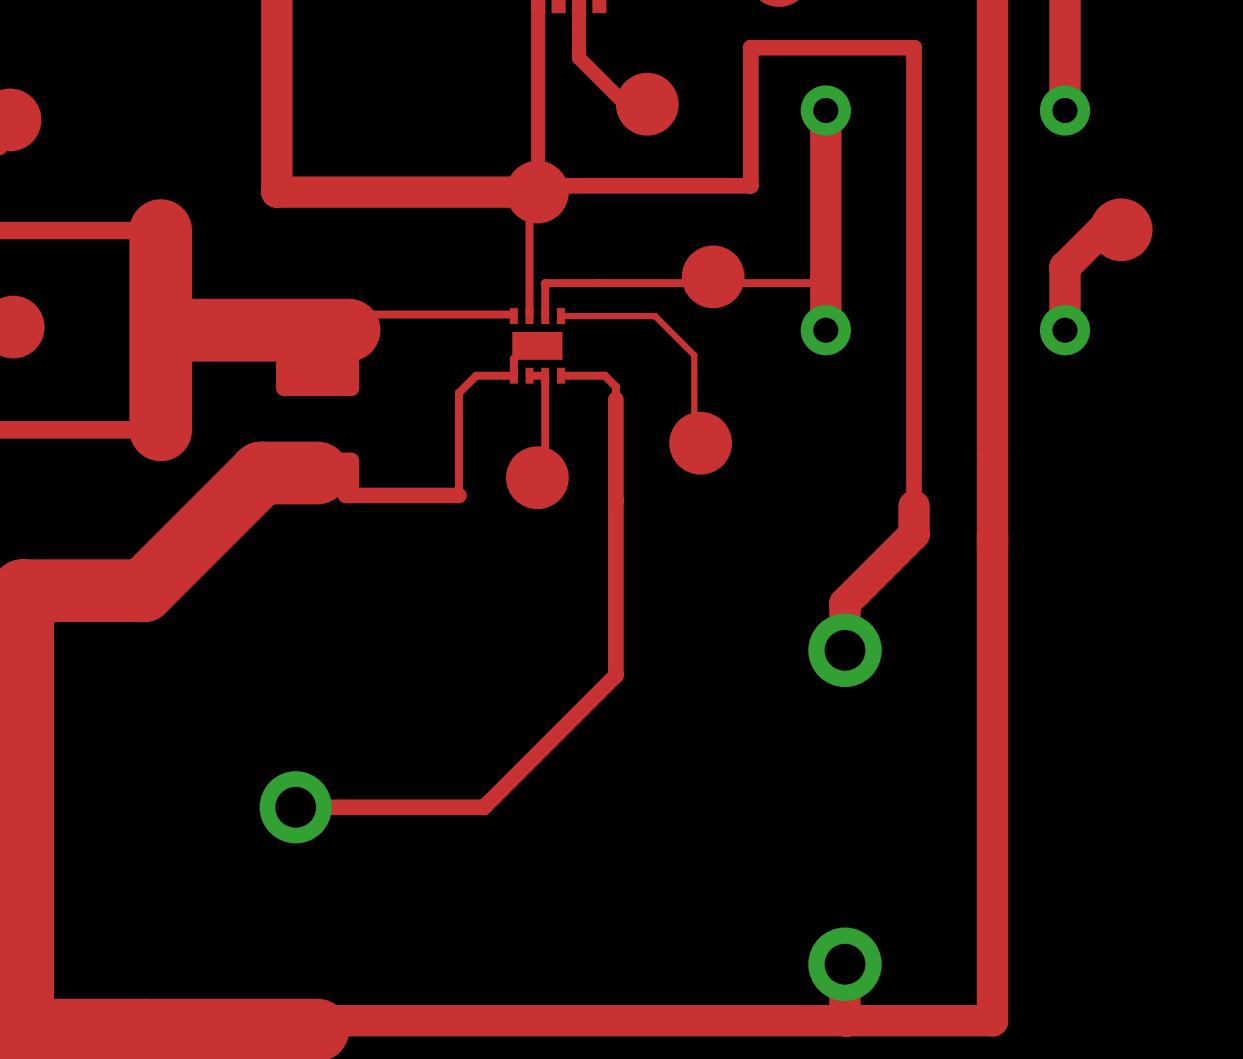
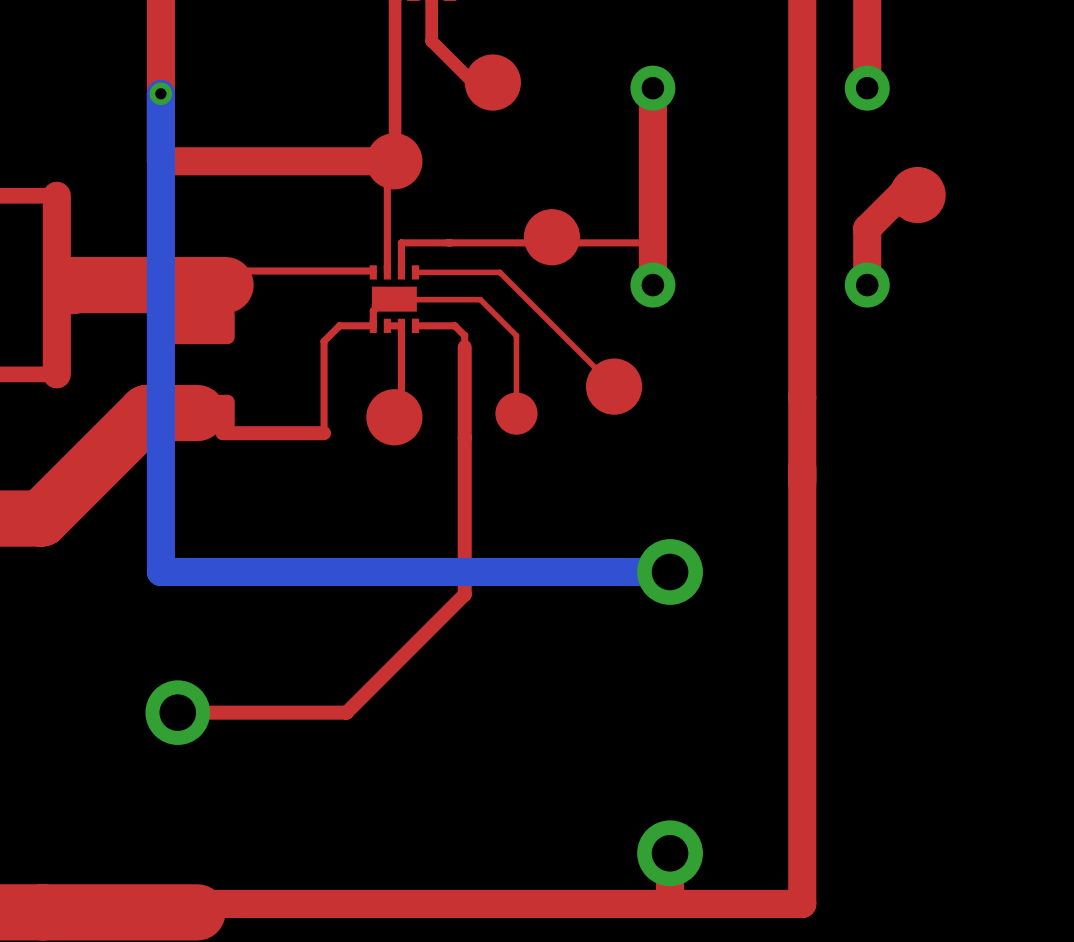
bottom track: none -> (160, 93) (160, 571) (670, 571)
via: none -> (160, 93)
top track: (549, 185) (750, 185) (750, 47) (914, 47) (914, 534) (844, 603) (844, 650) -> none
top track width: thick (160, 230) (160, 429) -> thin (56, 195) (56, 374)
top track: none -> (394, 299) (480, 299) (516, 335) (516, 413)
top track: (694, 355) (694, 443) (700, 443) -> (535, 307) (613, 386)
part position: (700, 443) -> (614, 386)
part: none -> (516, 413)

